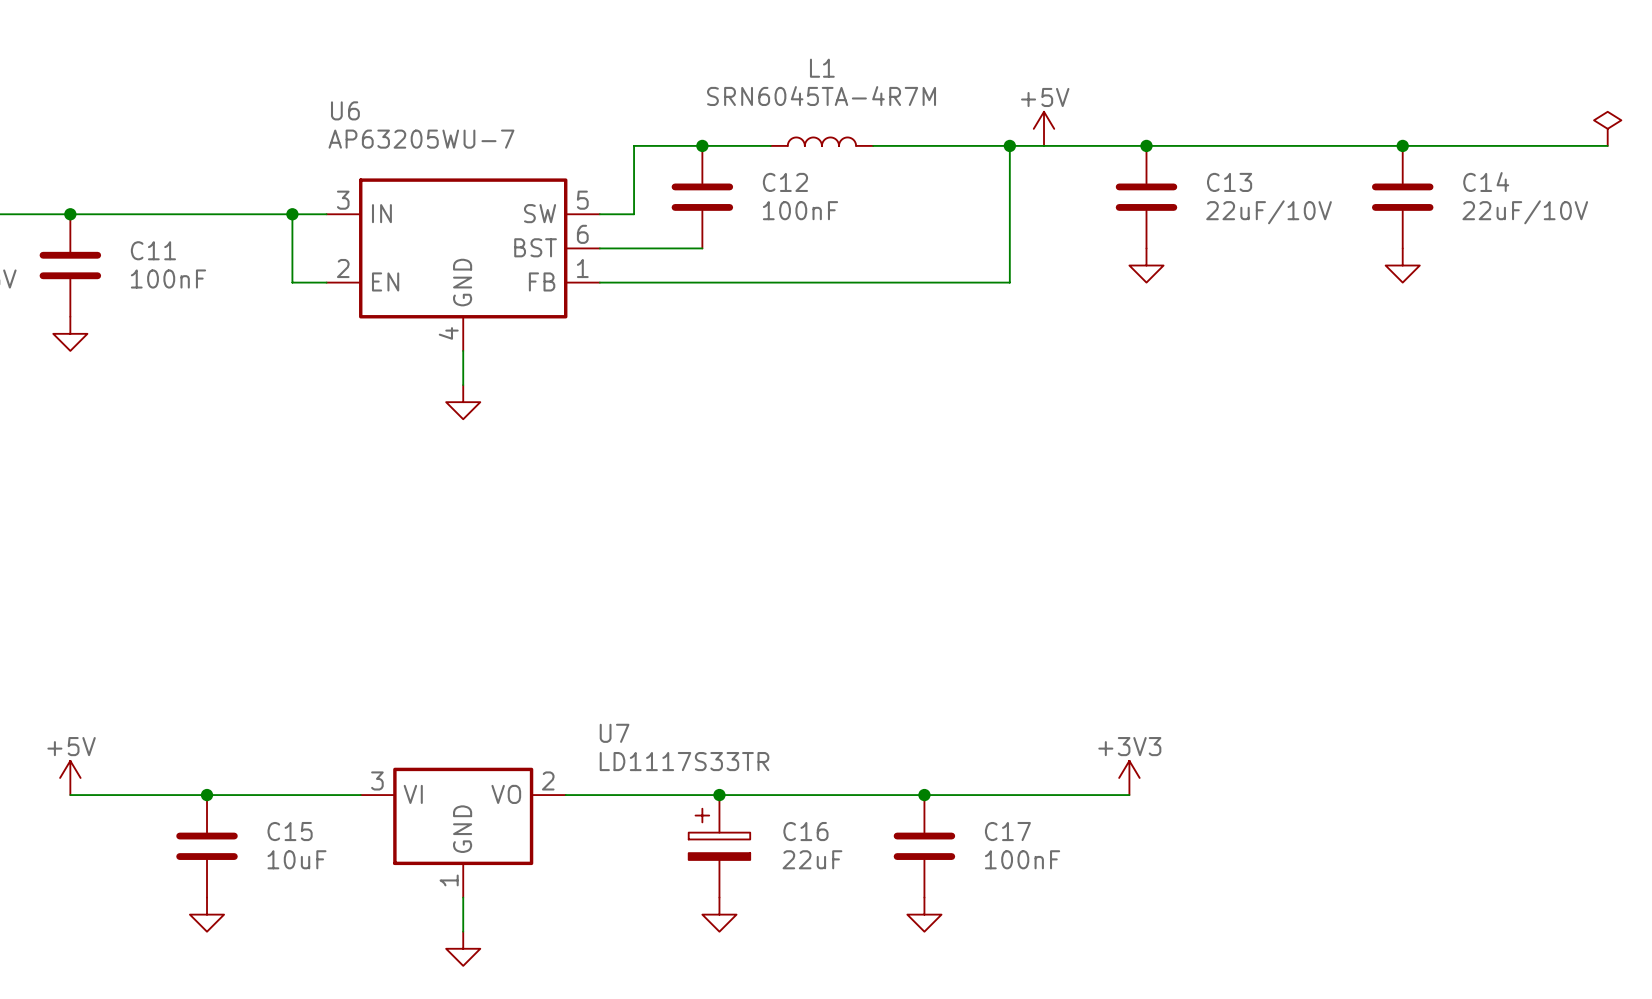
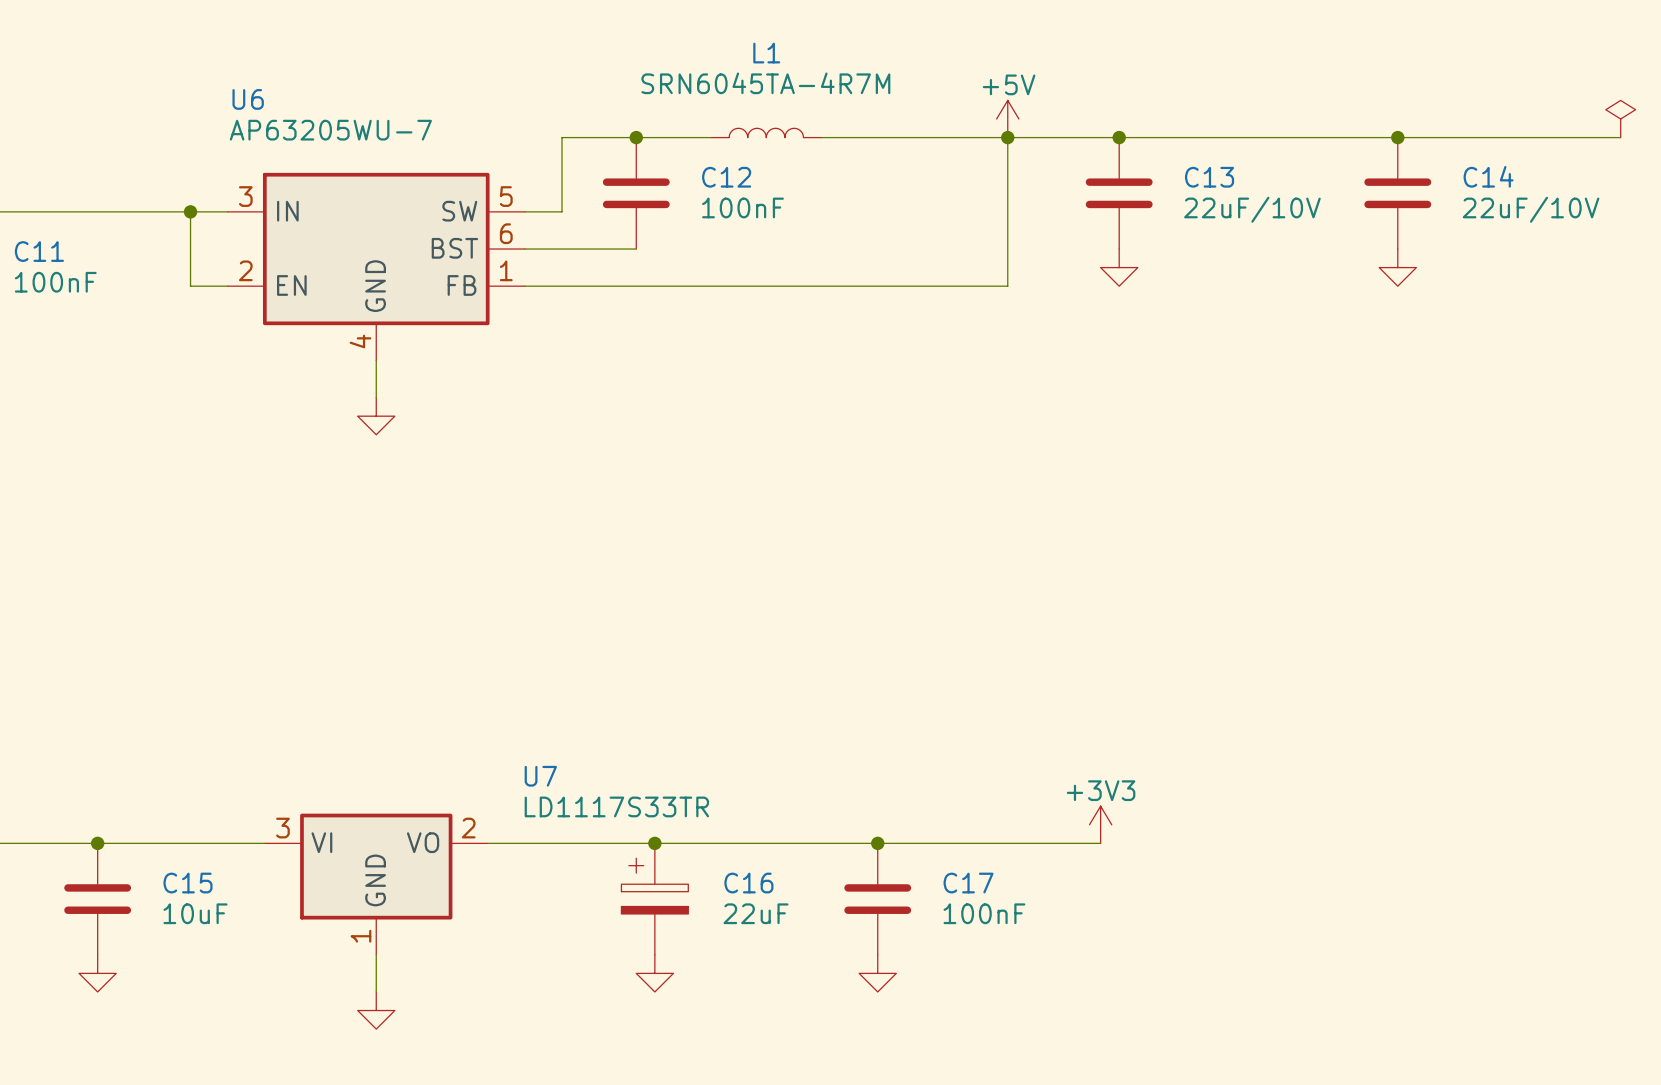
wire: (1009, 145) (1009, 282) -> (1007, 137) (1007, 286) (970, 286)
junction position: (1009, 145) -> (1007, 137)

